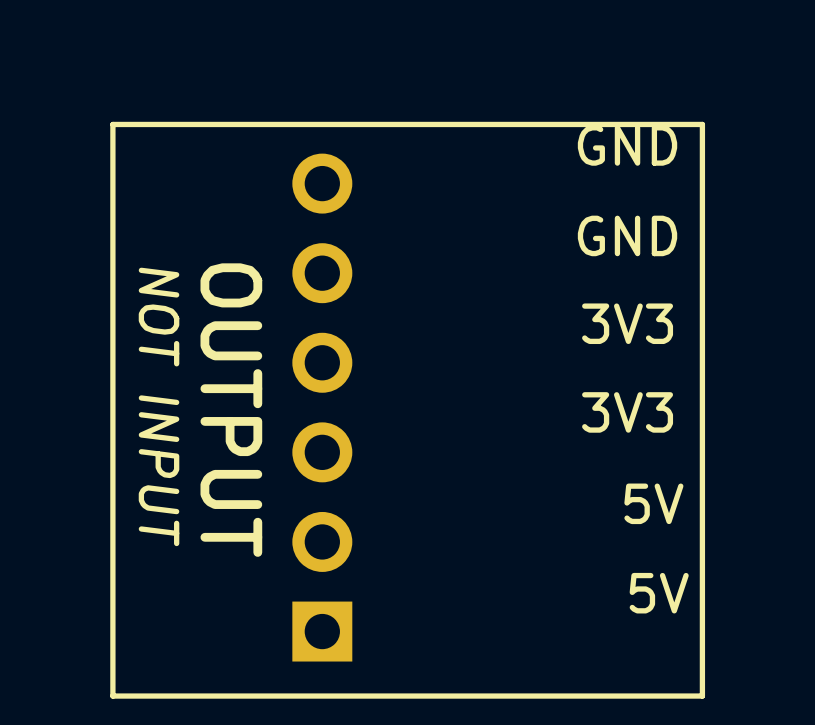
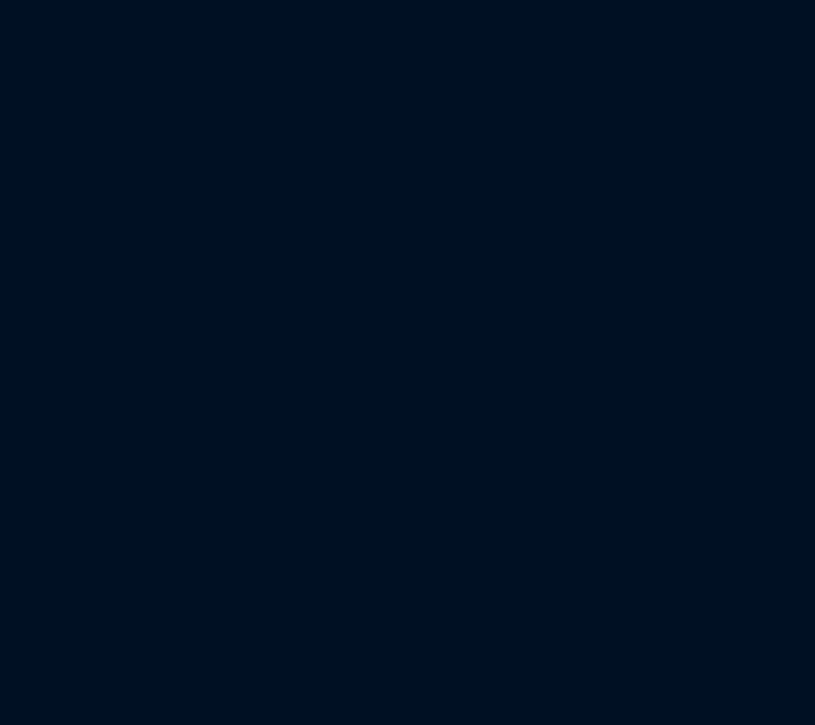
line: (702, 124) (112, 124) (112, 696) (702, 696) (702, 124) -> none
text: GND (627, 145) -> none
text: GND (627, 235) -> none
text: 3V3 (627, 323) -> none
text: NOT INPUT (159, 406) -> none
part: (322, 407) -> none
text: OUTPUT (231, 410) -> none
text: 3V3 (627, 412) -> none
text: 5V (653, 503) -> none
text: 5V (659, 593) -> none

